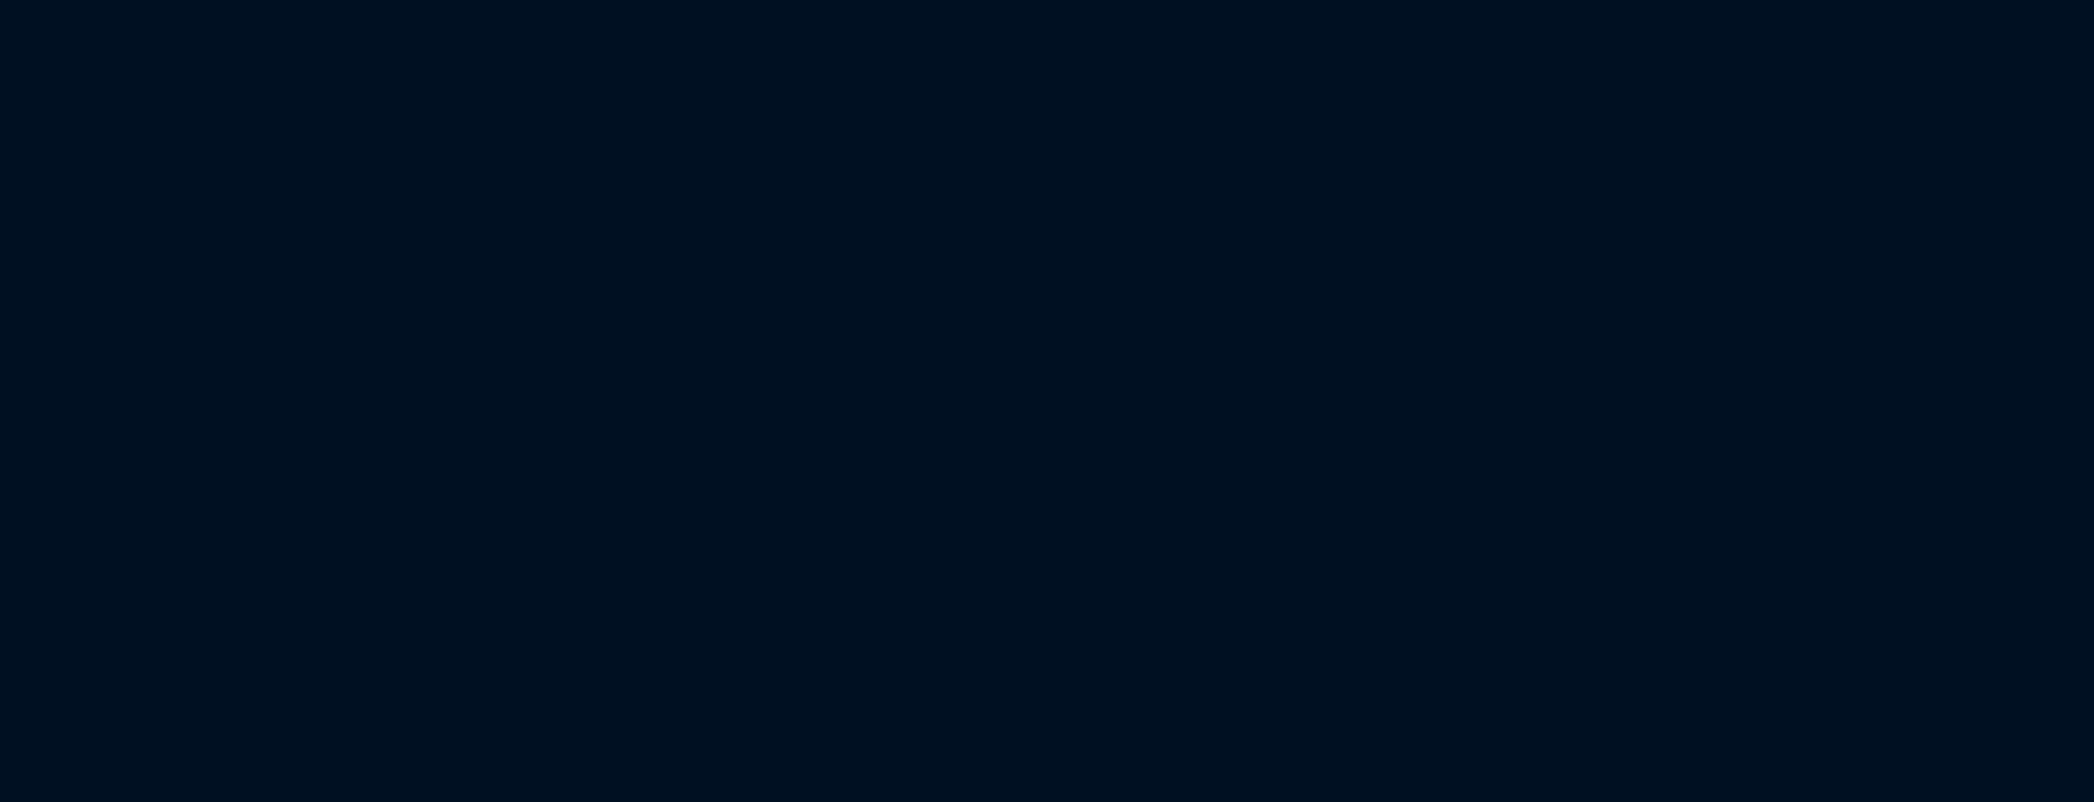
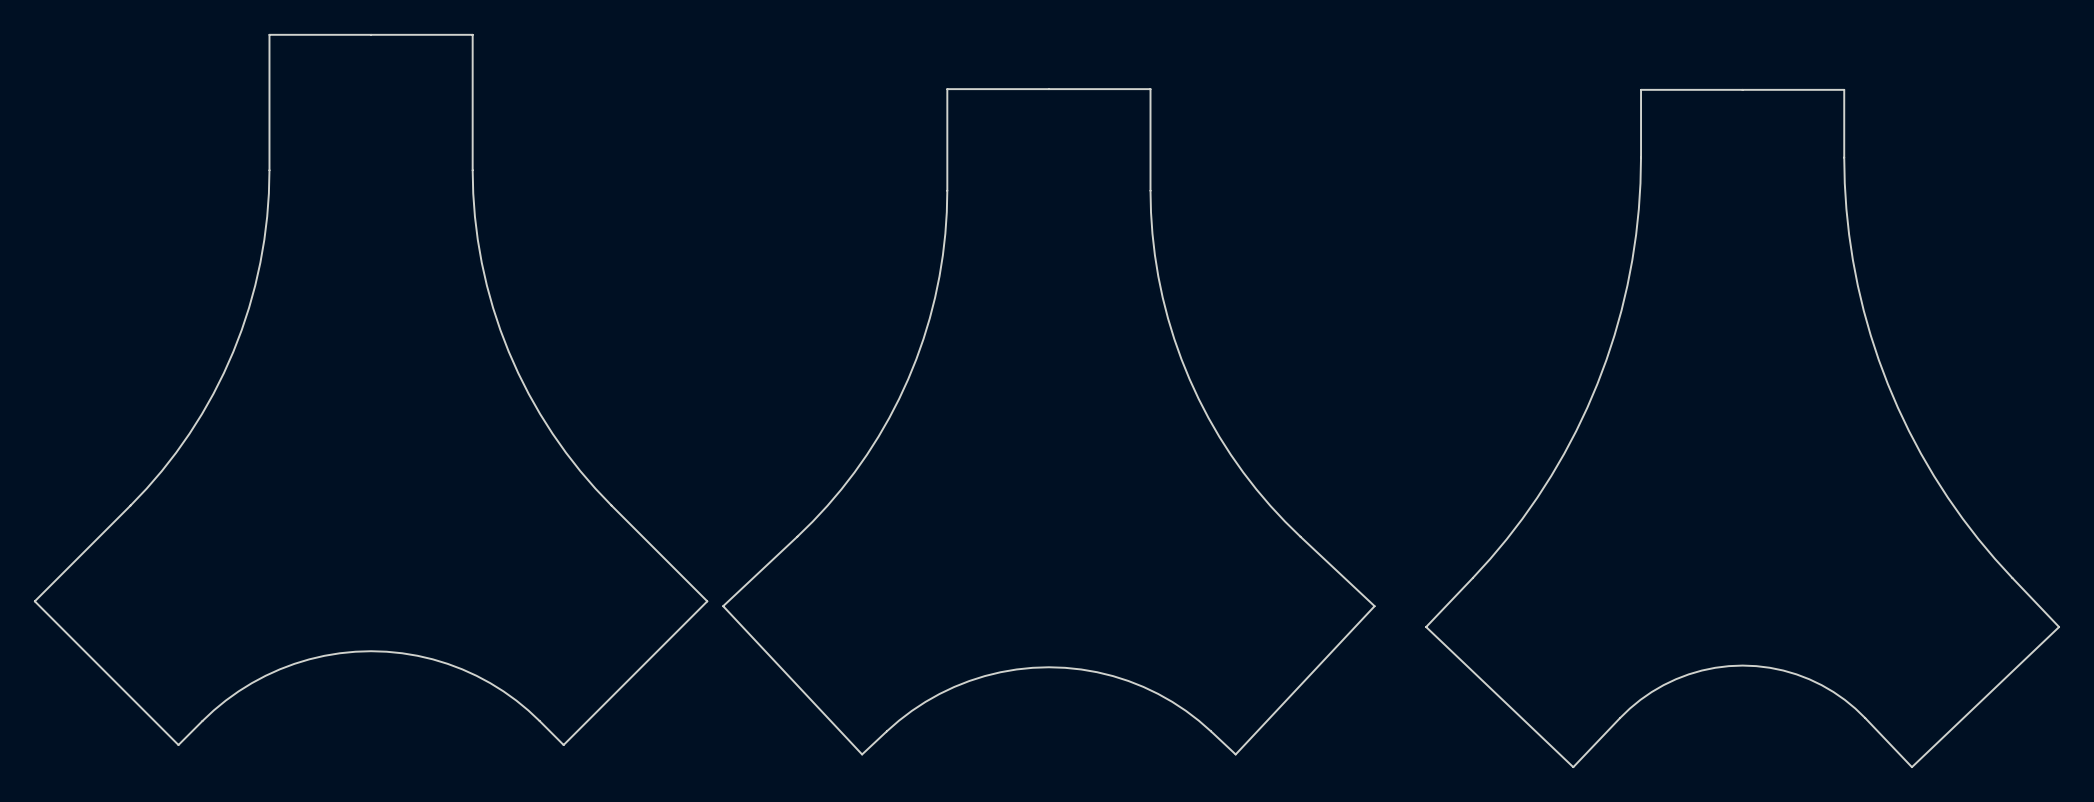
board edge: none -> (269, 34) (472, 34) (472, 170) (474, 216) (486, 285) (508, 351) (540, 414) (580, 471) (611, 505) (707, 601) (563, 745) (516, 700) (476, 675) (432, 659) (402, 653) (371, 651) (339, 653) (309, 659) (265, 675) (225, 700) (178, 745) (34, 601) (130, 505) (161, 471) (202, 414) (233, 351) (255, 285) (267, 216) (269, 170) (269, 34)
board edge: none -> (947, 89) (1150, 89) (1151, 212) (1154, 255) (1168, 318) (1189, 379) (1219, 436) (1256, 489) (1285, 521) (1374, 606) (1235, 754) (1185, 710) (1143, 686) (1097, 672) (1048, 667) (1000, 672) (954, 686) (911, 710) (862, 754) (723, 606) (812, 521) (841, 489) (878, 436) (908, 379) (929, 318) (942, 255) (946, 212) (947, 89)
board edge: none -> (1641, 89) (1844, 89) (1844, 183) (1849, 234) (1863, 310) (1887, 383) (1921, 453) (1962, 518) (1995, 558) (2059, 627) (1911, 767) (1855, 708) (1833, 692) (1809, 679) (1783, 670) (1742, 665) (1715, 667) (1688, 674) (1651, 692) (1629, 708) (1573, 767) (1426, 627) (1490, 558) (1522, 518) (1564, 453) (1597, 383) (1621, 310) (1636, 234) (1640, 183) (1641, 89)

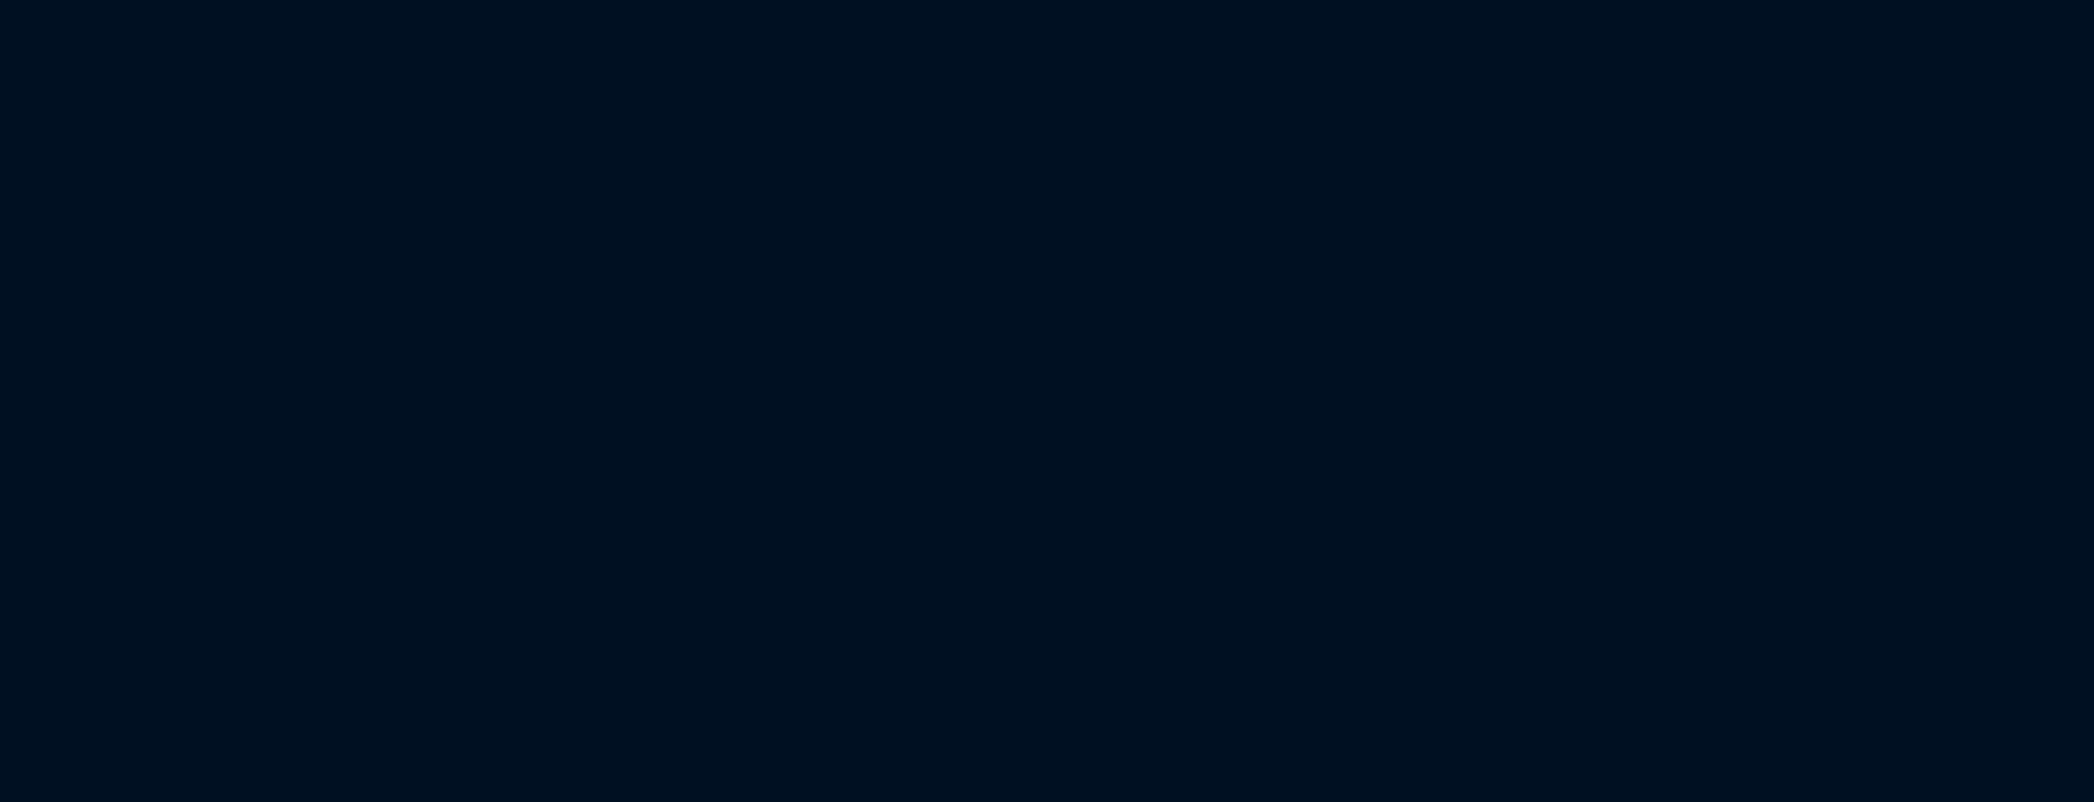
board edge: (269, 34) (472, 34) (472, 170) (474, 216) (486, 285) (508, 351) (540, 414) (580, 471) (611, 505) (707, 601) (563, 745) (516, 700) (476, 675) (432, 659) (402, 653) (371, 651) (339, 653) (309, 659) (265, 675) (225, 700) (178, 745) (34, 601) (130, 505) (161, 471) (202, 414) (233, 351) (255, 285) (267, 216) (269, 170) (269, 34) -> none
board edge: (947, 89) (1150, 89) (1151, 212) (1154, 255) (1168, 318) (1189, 379) (1219, 436) (1256, 489) (1285, 521) (1374, 606) (1235, 754) (1185, 710) (1143, 686) (1097, 672) (1048, 667) (1000, 672) (954, 686) (911, 710) (862, 754) (723, 606) (812, 521) (841, 489) (878, 436) (908, 379) (929, 318) (942, 255) (946, 212) (947, 89) -> none
board edge: (1641, 89) (1844, 89) (1844, 183) (1849, 234) (1863, 310) (1887, 383) (1921, 453) (1962, 518) (1995, 558) (2059, 627) (1911, 767) (1855, 708) (1833, 692) (1809, 679) (1783, 670) (1742, 665) (1715, 667) (1688, 674) (1651, 692) (1629, 708) (1573, 767) (1426, 627) (1490, 558) (1522, 518) (1564, 453) (1597, 383) (1621, 310) (1636, 234) (1640, 183) (1641, 89) -> none

